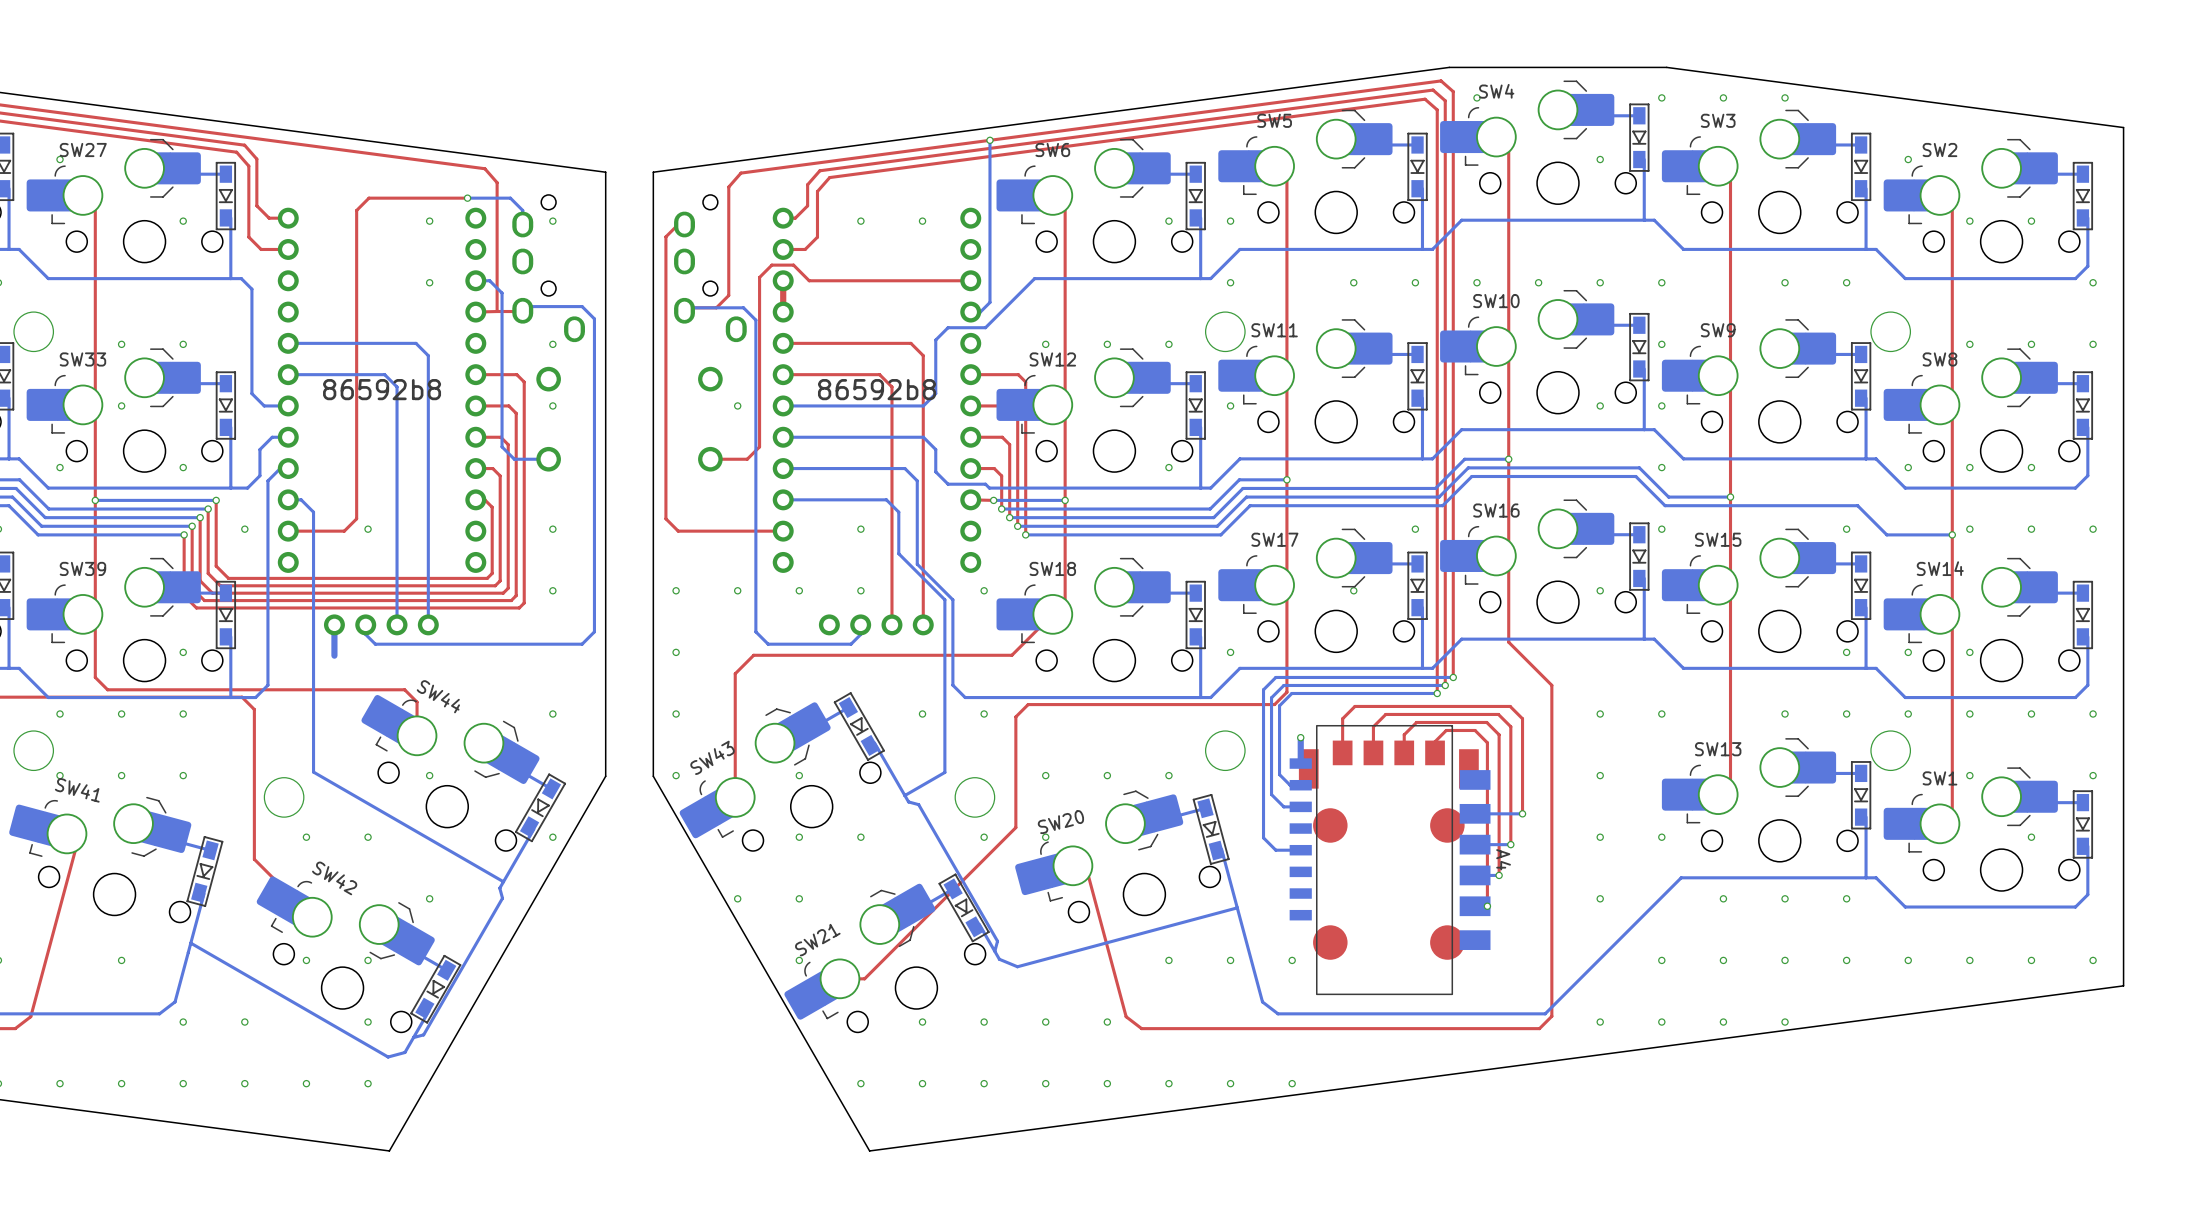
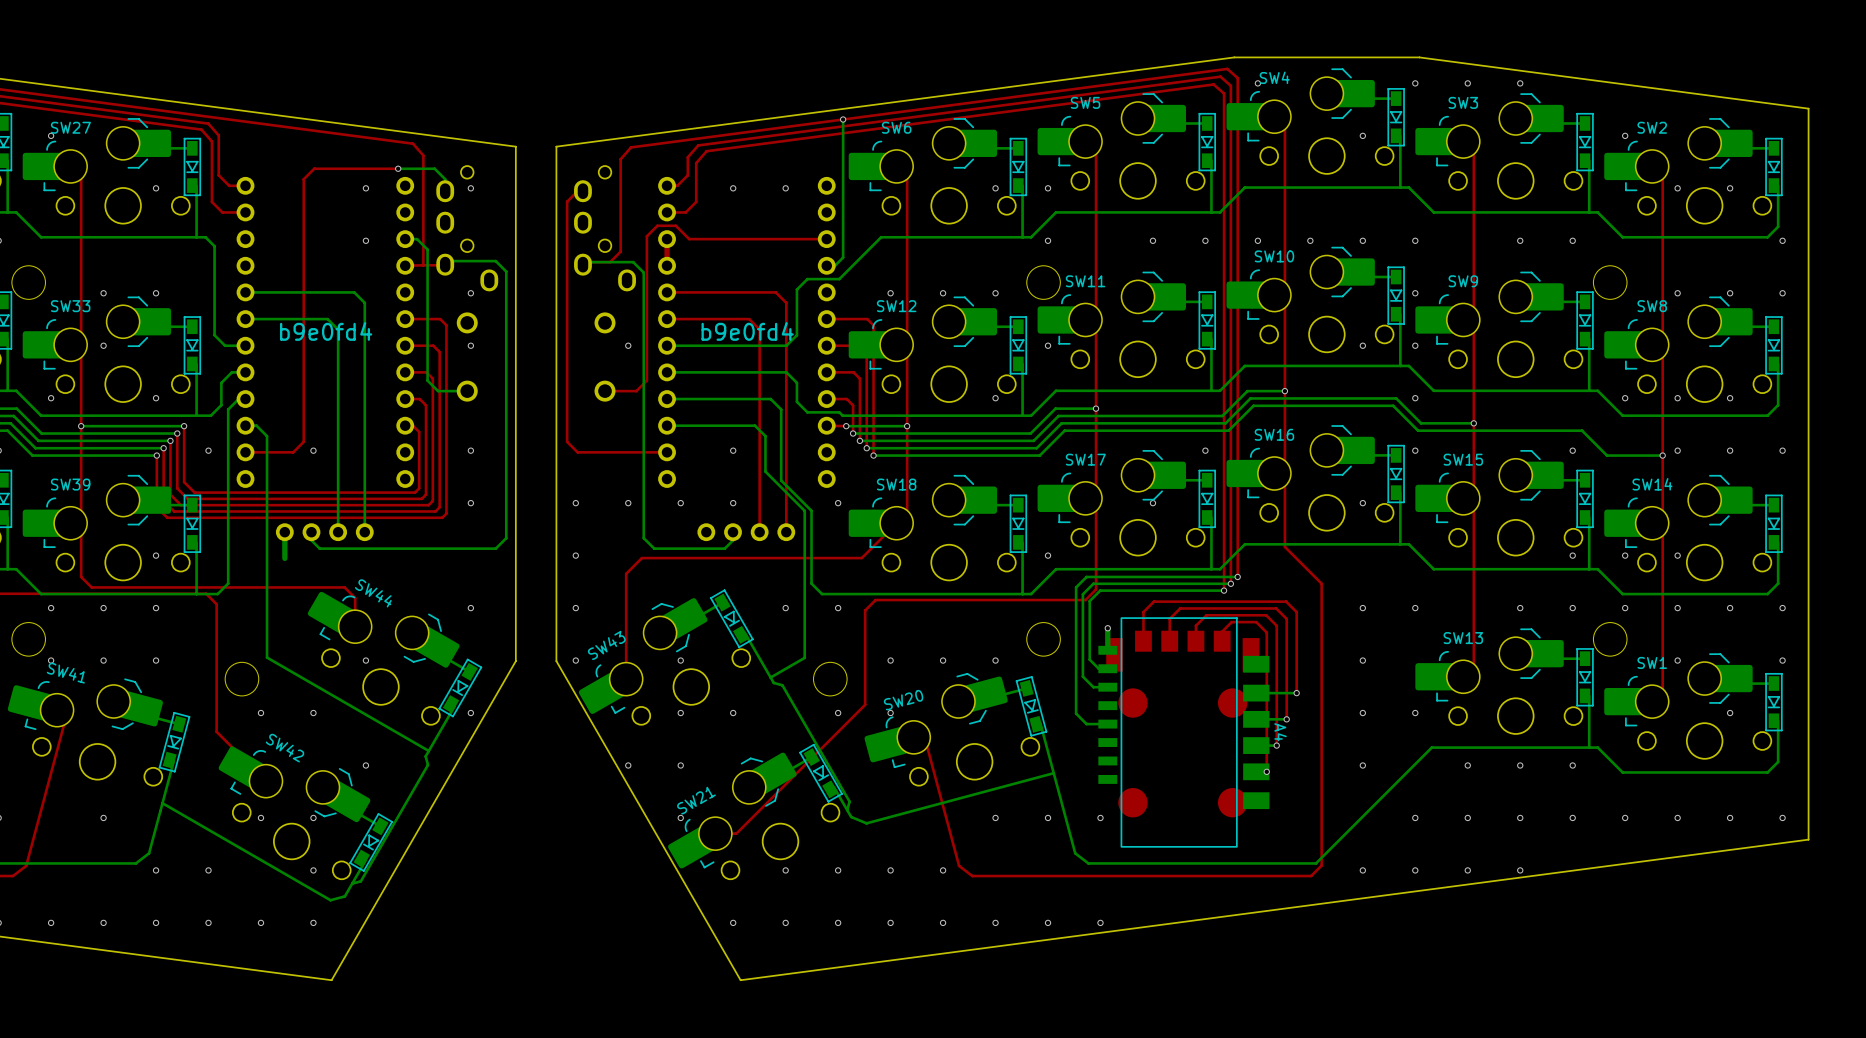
text: 86592b8 (382, 389) -> b9e0fd4 (326, 331)
text: 86592b8 (876, 389) -> b9e0fd4 (747, 331)

